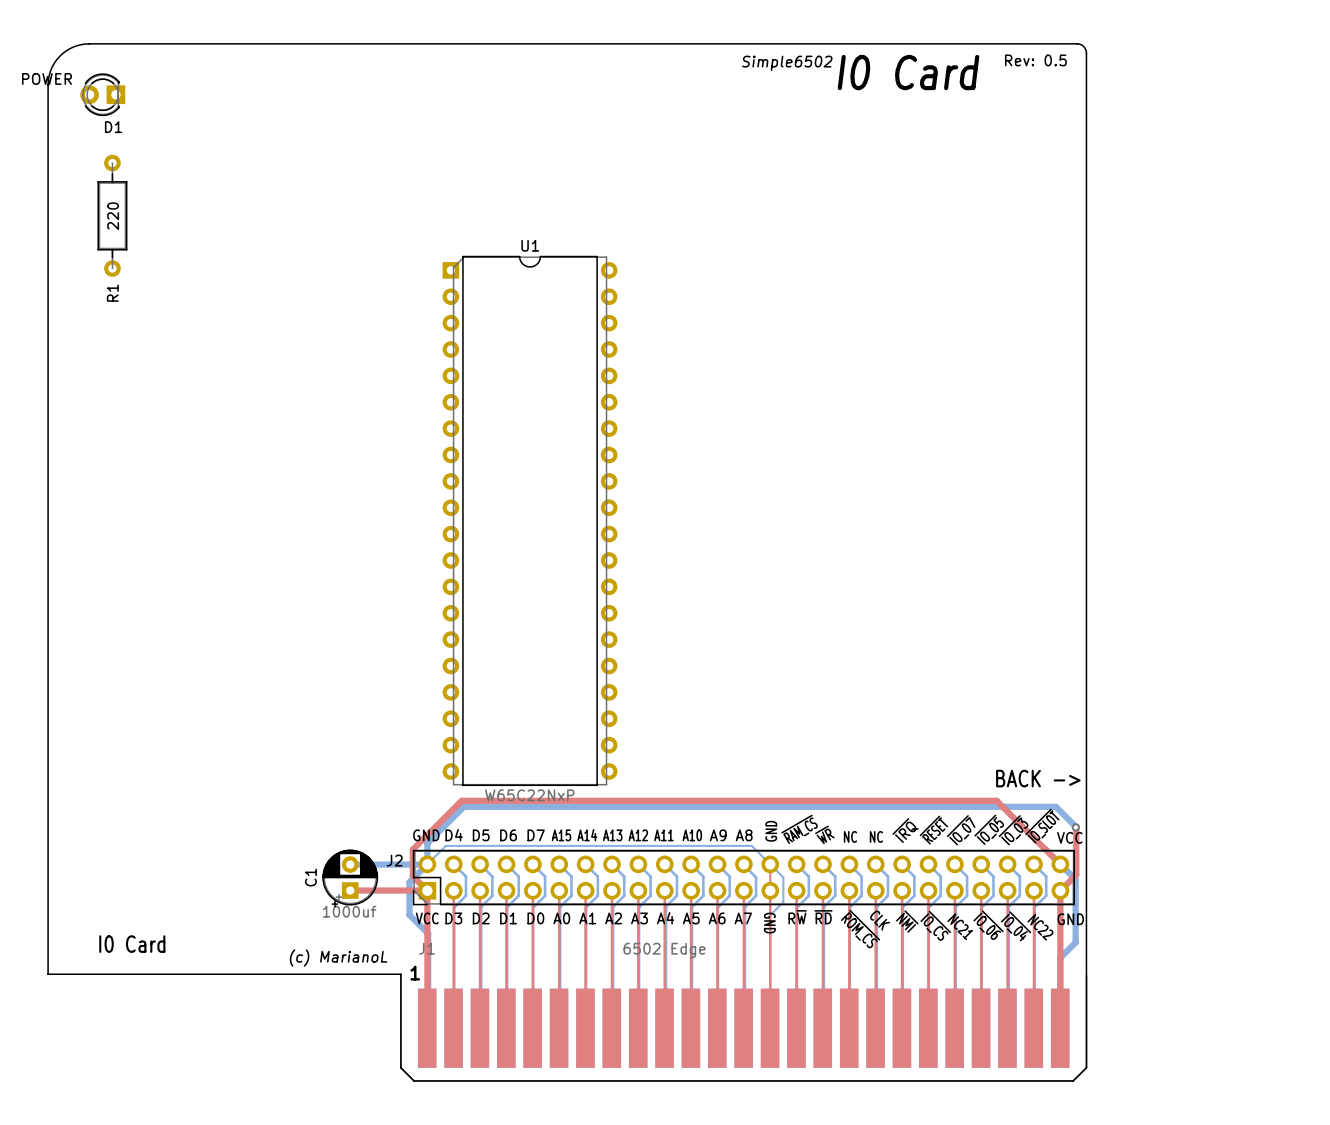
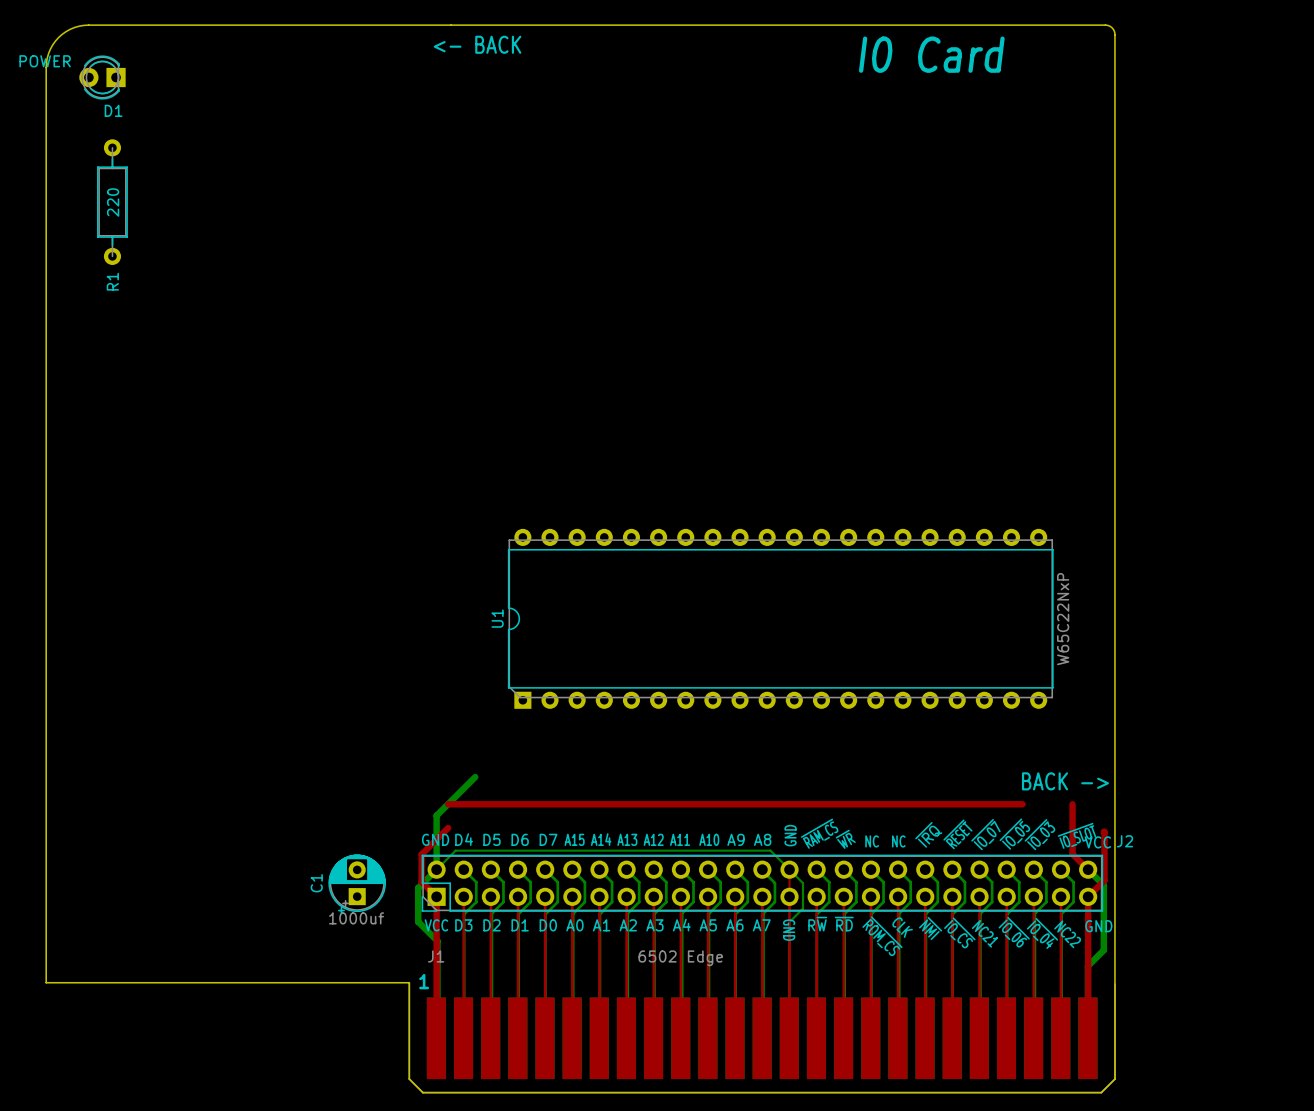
text: Rev: 0.5 (1035, 60) -> none
text: none -> <- BACK (477, 44)
text: Simple6502 (787, 63) -> none
U1 rotation: 0° (530, 520) -> 90° counterclockwise (780, 618)
top track: (461, 800) (438, 823) -> (471, 804) (448, 804)
top track: (996, 800) (1045, 849) -> (1072, 804) (1072, 854)
text rotation: 0° (1042, 826) -> 25° clockwise (1076, 835)
bottom track: (1075, 827) (1055, 806) (463, 806) (427, 843) -> (475, 777) (436, 815) (436, 847)
via: (1075, 827) -> none
J2 name position: J2 (394, 860) -> J2 (1124, 841)
bottom track: (350, 864) (427, 864) -> none
top track: (350, 890) (427, 890) -> none
text: I0 Card (132, 944) -> none
text: (c) MarianoL (338, 957) -> none

